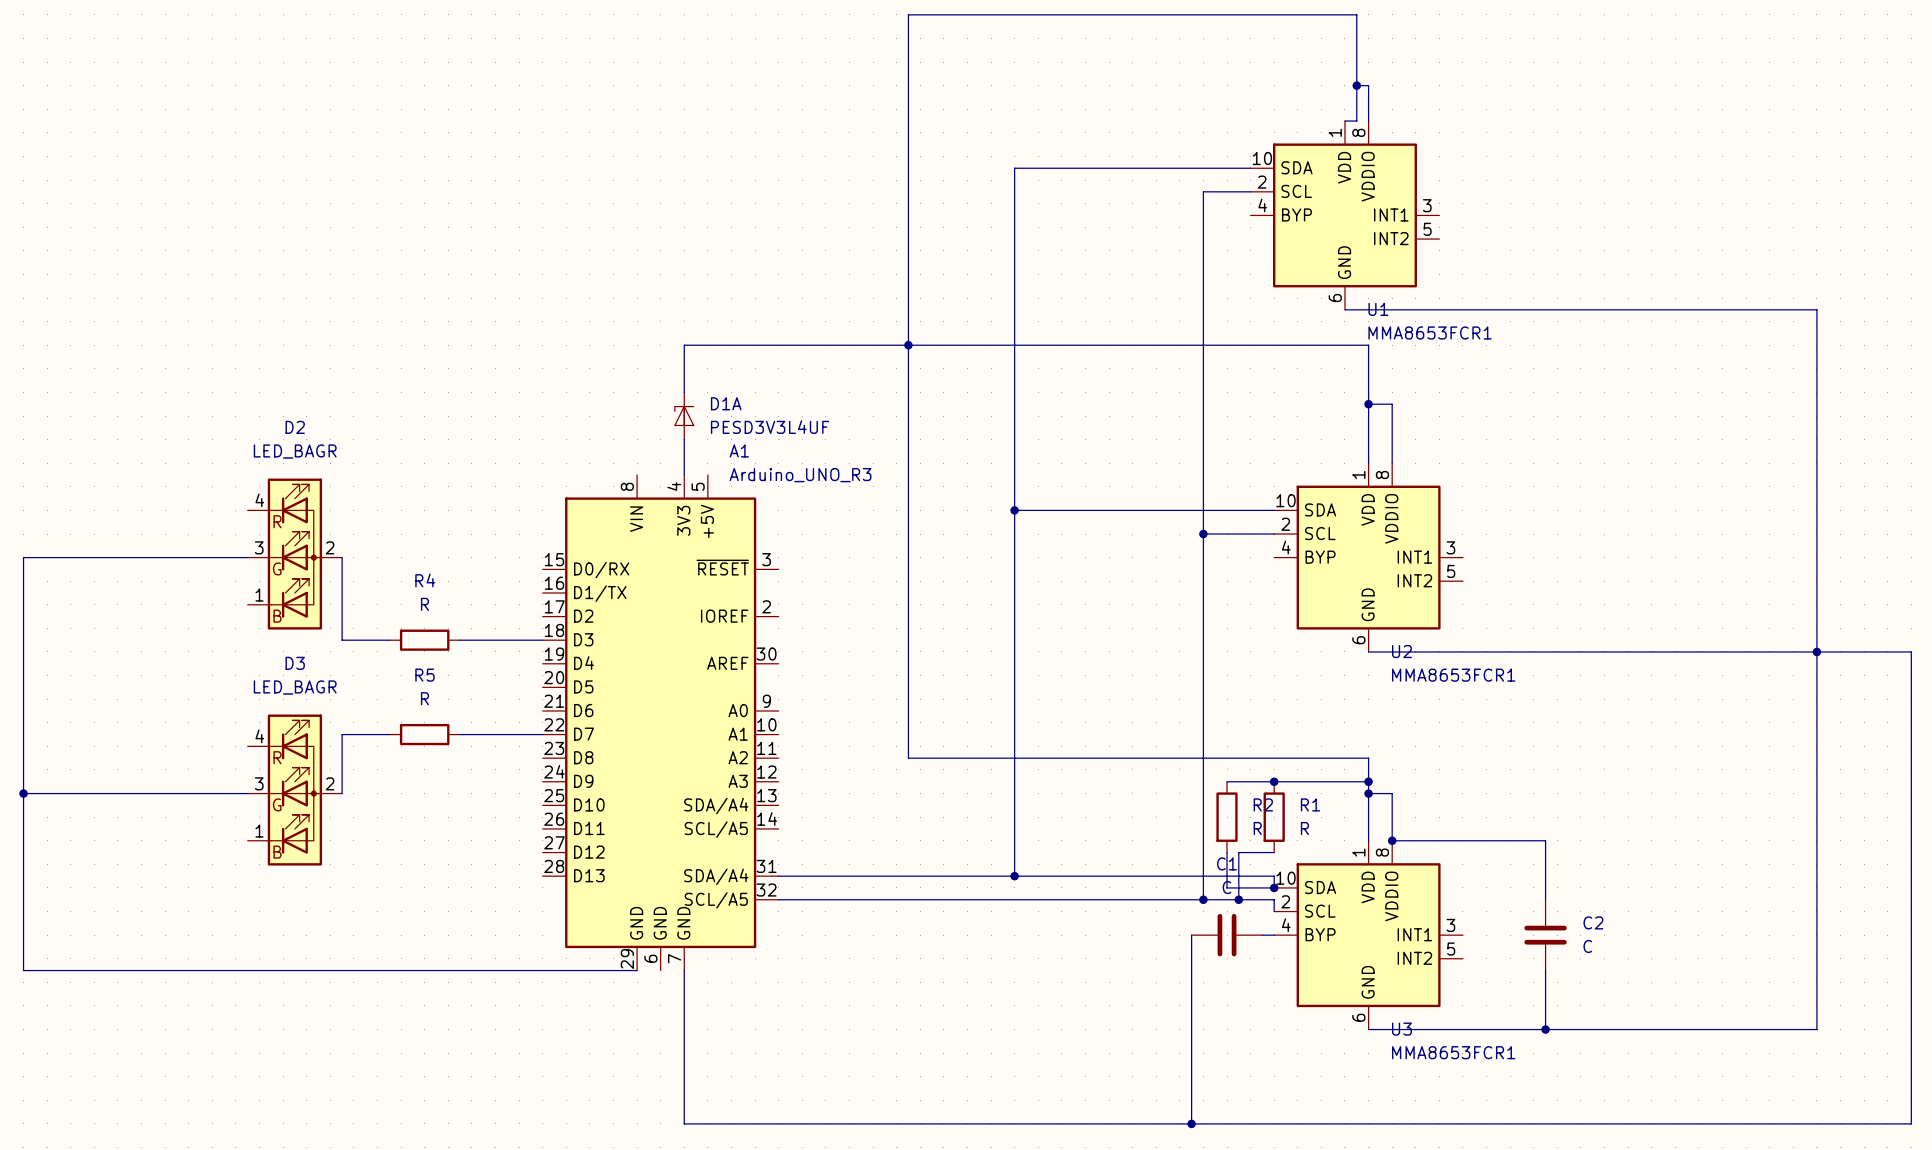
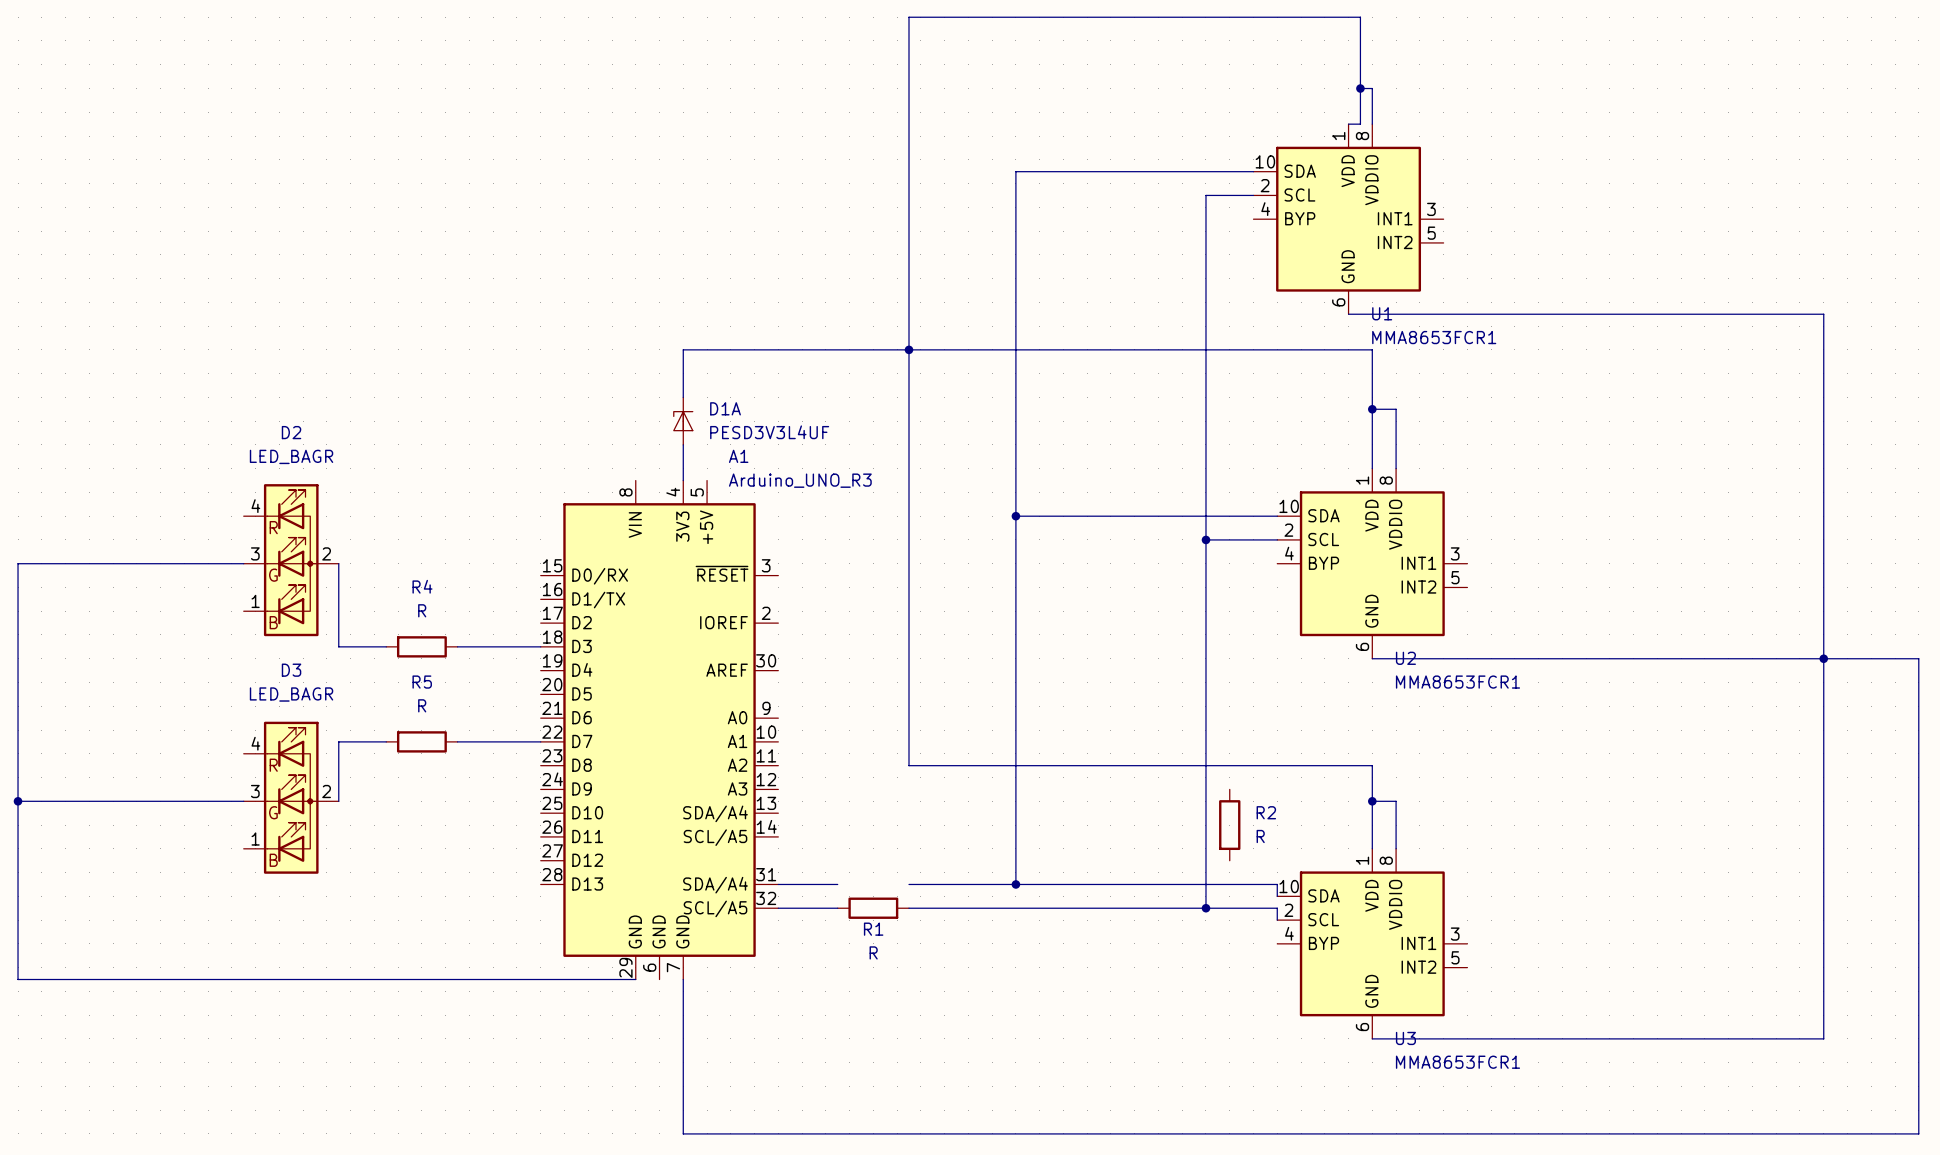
wire: (1227, 781) (1368, 781) -> none
junction: (1274, 781) -> none
junction: (1368, 781) -> none
R1 name position: R1 (1310, 804) -> R1 (873, 929)
R1 rotation: 0° (1274, 817) -> 90° clockwise (873, 908)
R1 position: (1274, 817) -> (873, 908)
wire: (1392, 840) (1545, 840) (1545, 899) -> none
junction: (1392, 840) -> none
wire: (1227, 852) (1227, 887) (1274, 887) -> none
wire: (1274, 852) (1238, 852) (1238, 899) -> none
wire: (837, 876) (908, 876) -> none
junction: (1274, 887) -> none
wire: (837, 899) (908, 899) -> none
junction: (1238, 899) -> none
wire: (1191, 935) (1191, 1123) -> none
C1: C (1227, 935) -> none
wire: (1262, 935) (1274, 935) -> none
C2: C (1545, 935) -> none
wire: (1545, 970) (1545, 1029) -> none
junction: (1545, 1029) -> none
junction: (1191, 1123) -> none

